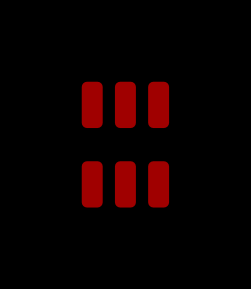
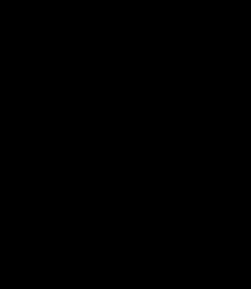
part: (125, 144) -> none

